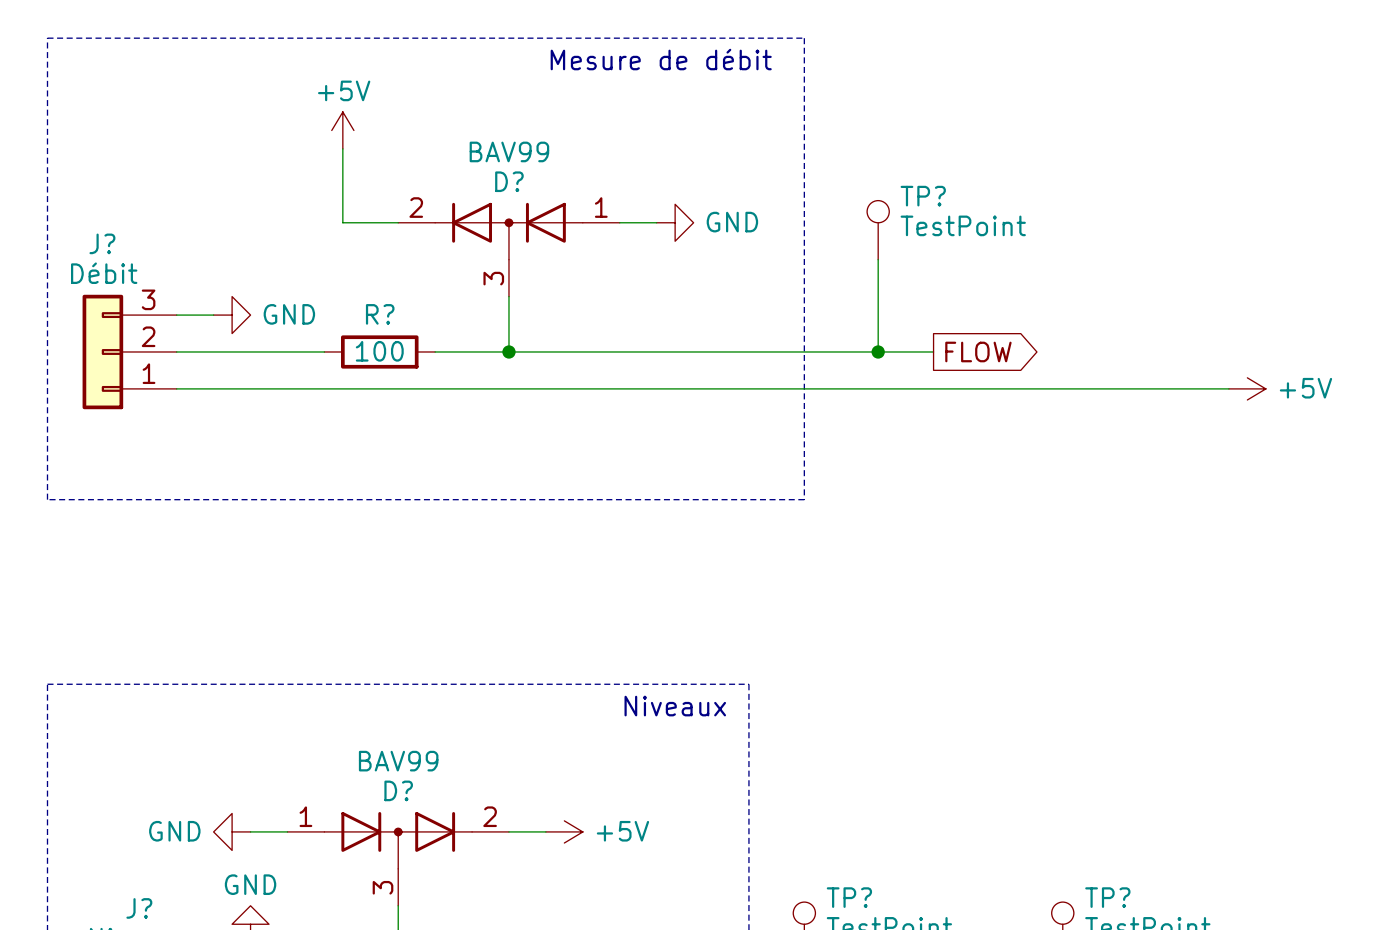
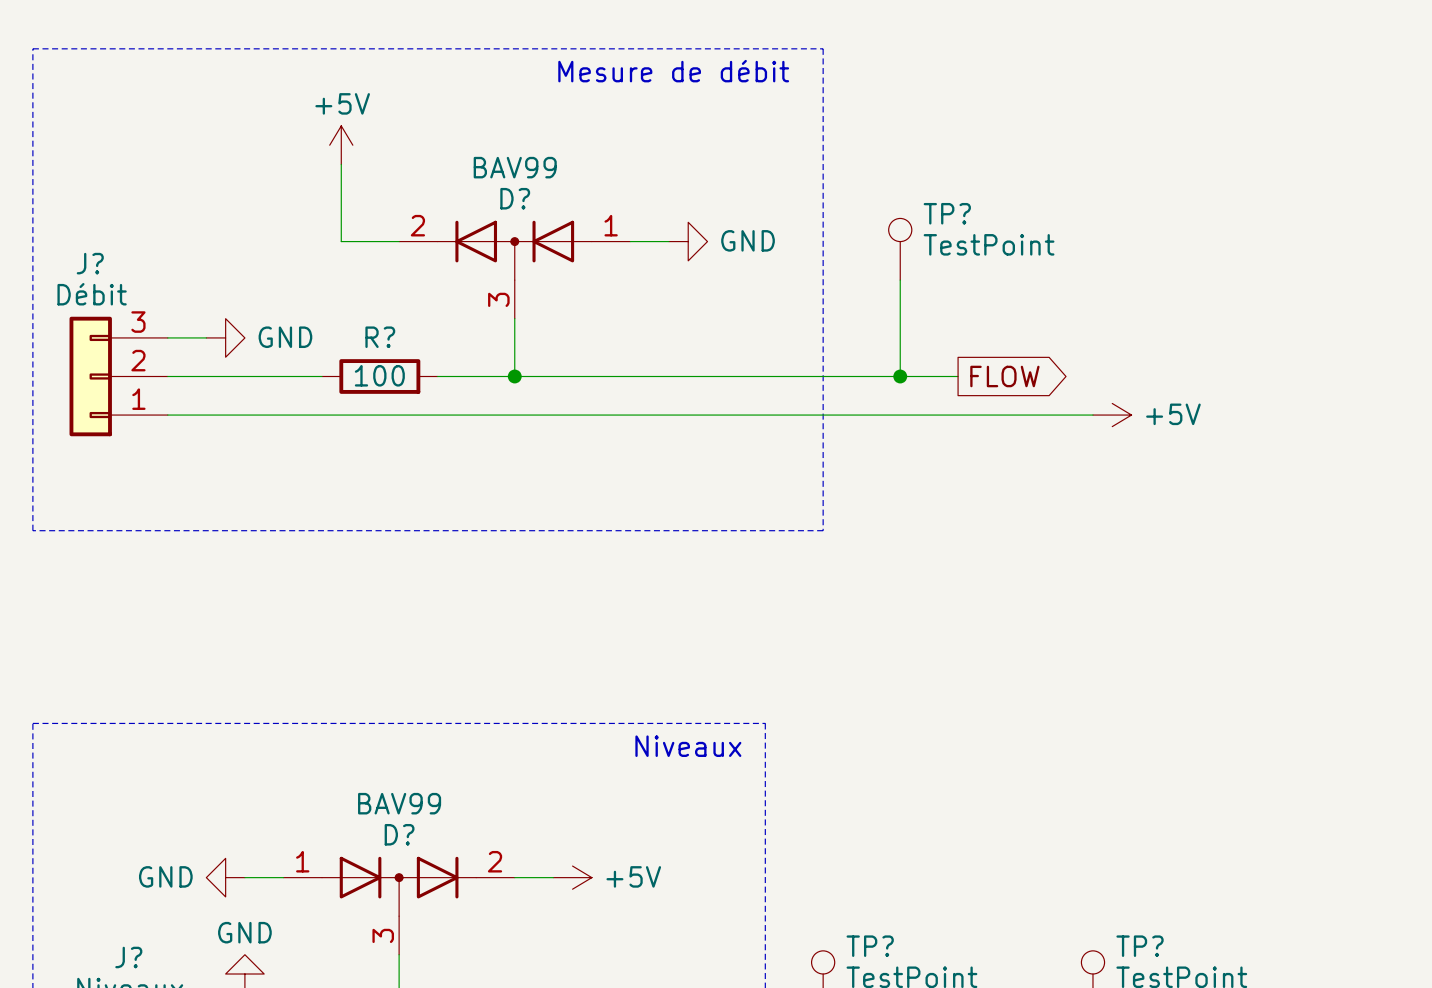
wire: (1062, 388) (1228, 388) -> none
power symbol position: +5V (1247, 388) -> +5V (1112, 415)

